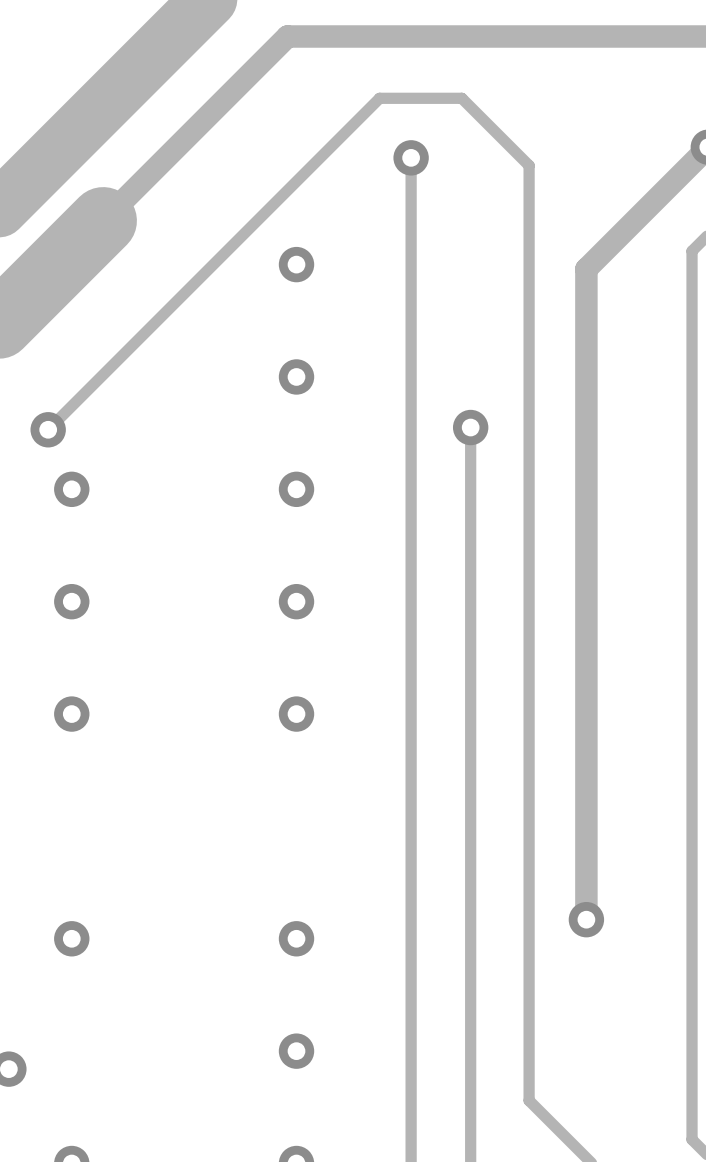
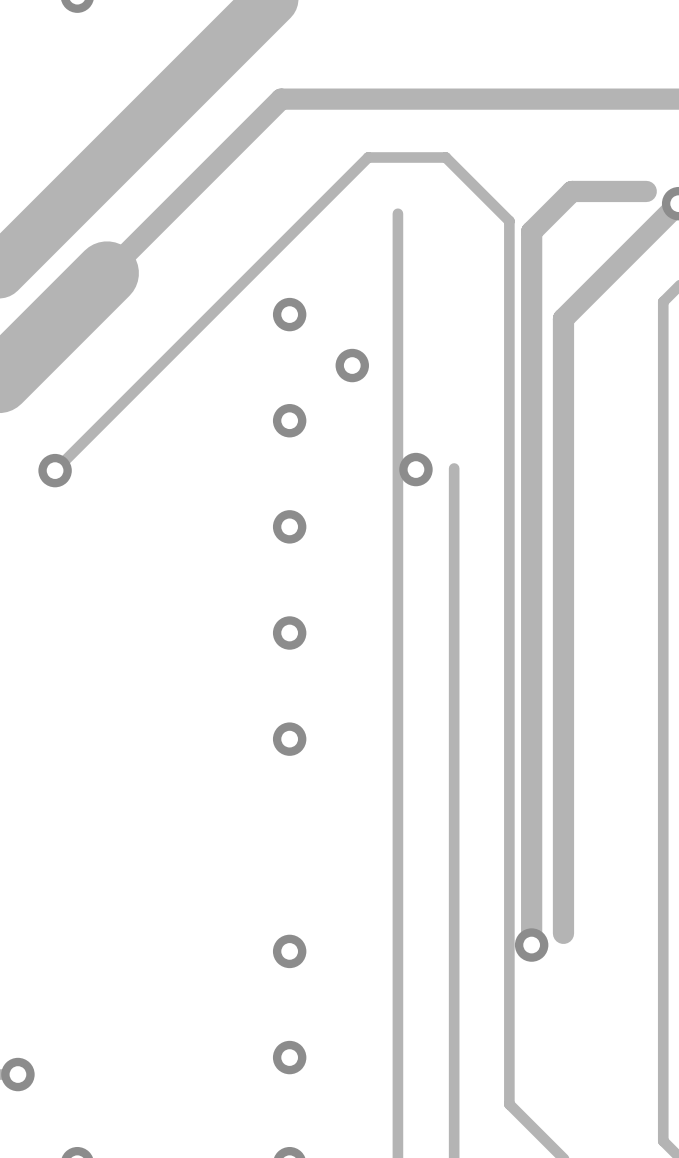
track: none -> (646, 191) (571, 191) (531, 231) (531, 945)
via: (411, 157) -> none
via: none -> (352, 365)
via position: (470, 427) -> (415, 469)
via: (71, 489) -> none
via: (71, 601) -> none
via: (71, 714) -> none
via position: (586, 919) -> (531, 945)
via: (71, 938) -> none

